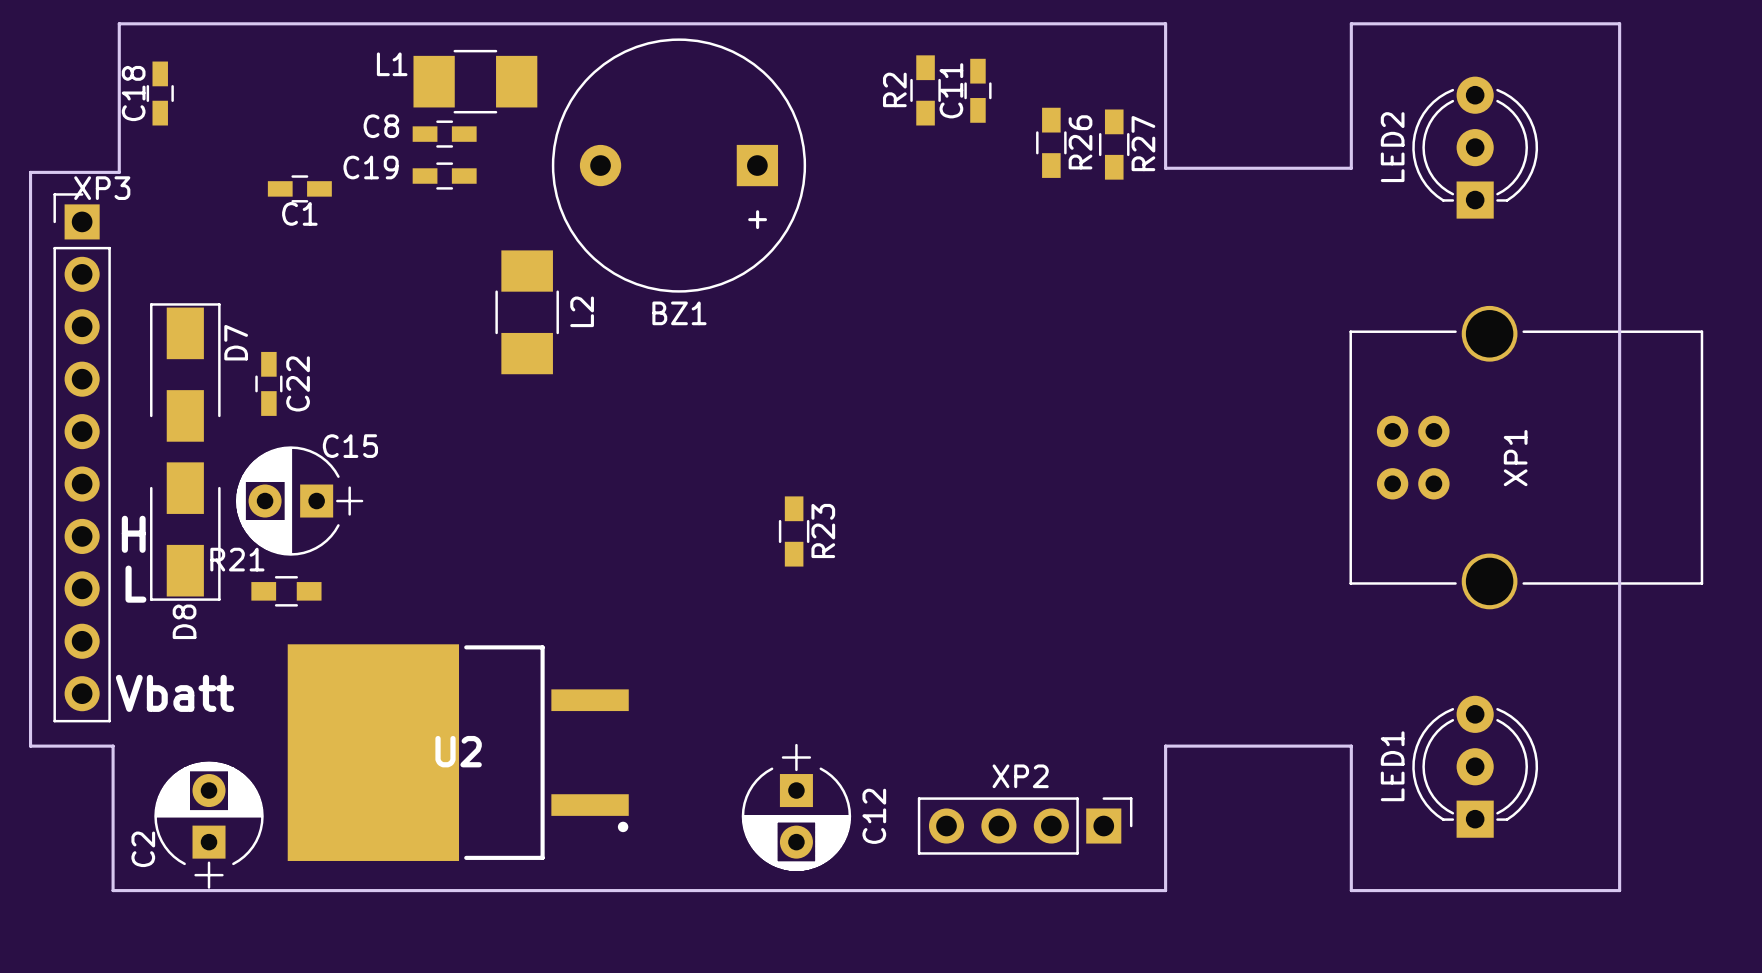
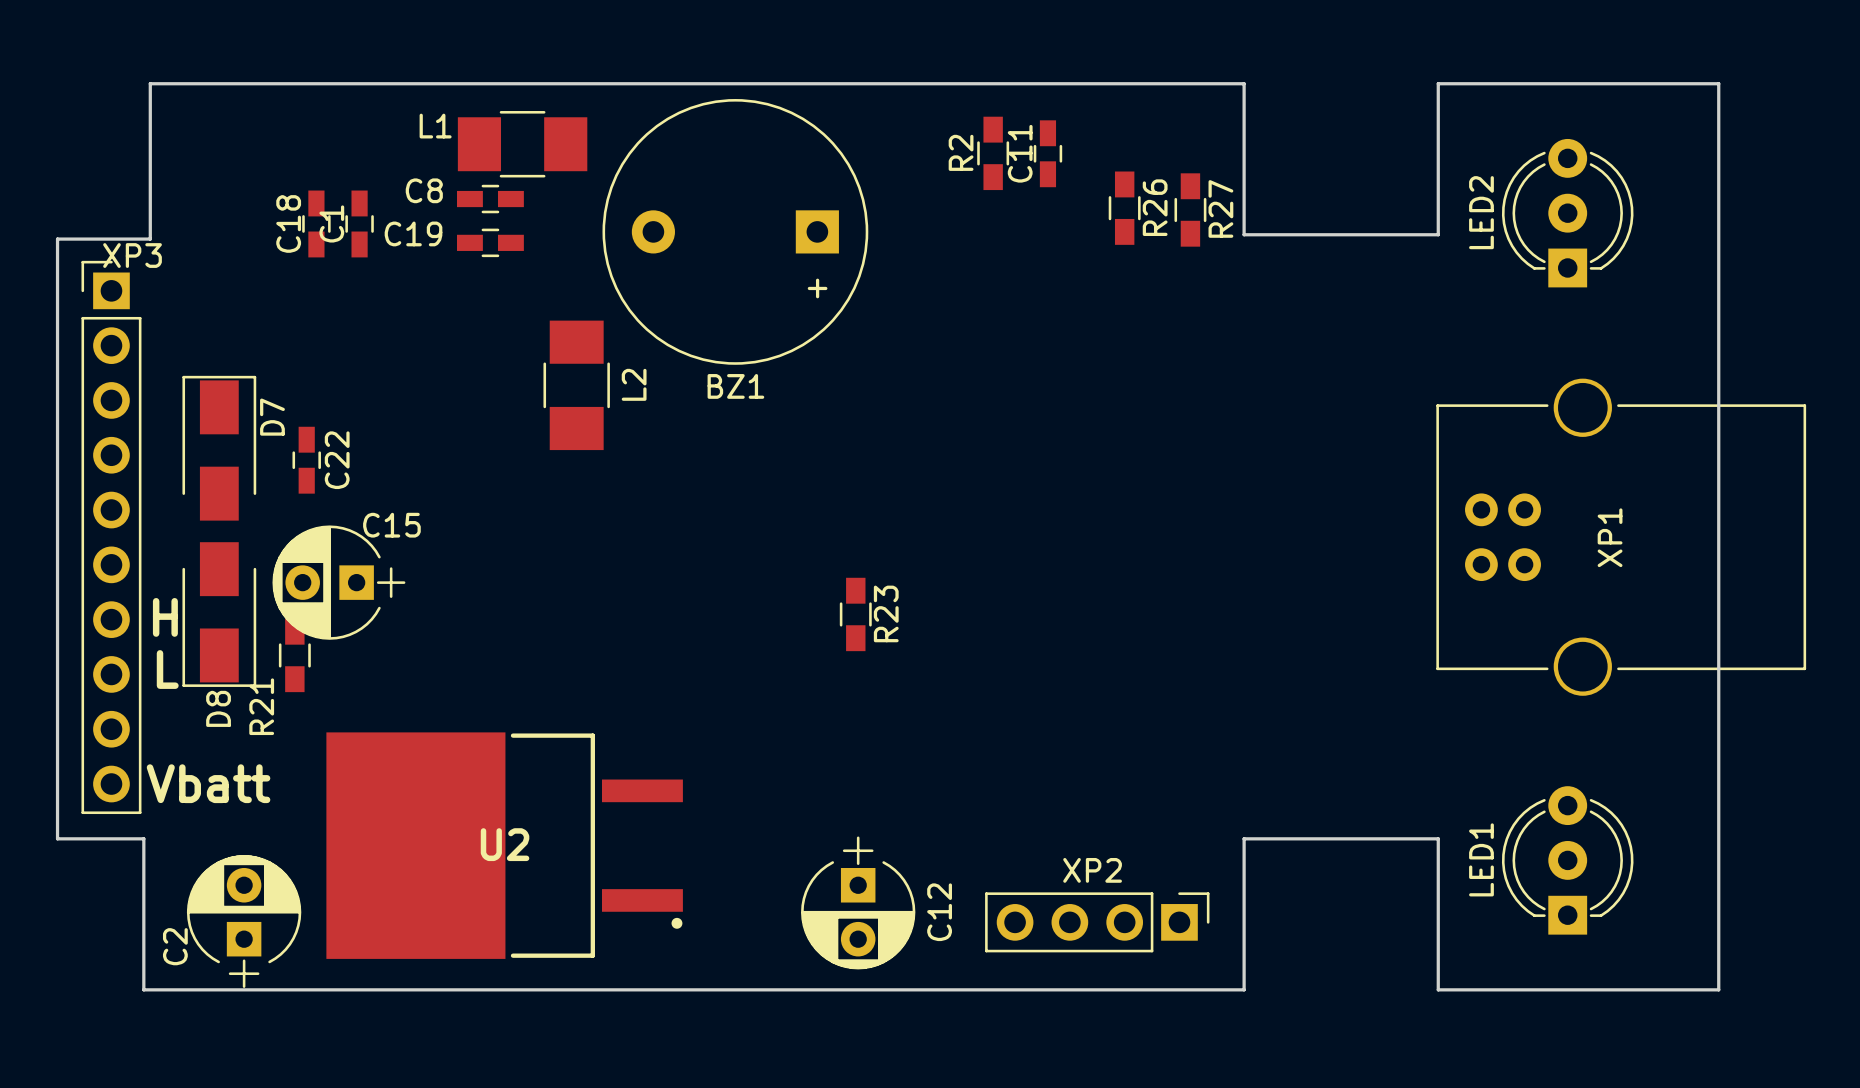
C18 position: (160, 93) -> (316, 223)
C1 rotation: 0° (299, 188) -> 90° clockwise (359, 223)
R21 name position: R21 (237, 559) -> R21 (261, 706)
R21 rotation: 0° (286, 591) -> 90° clockwise (294, 655)

